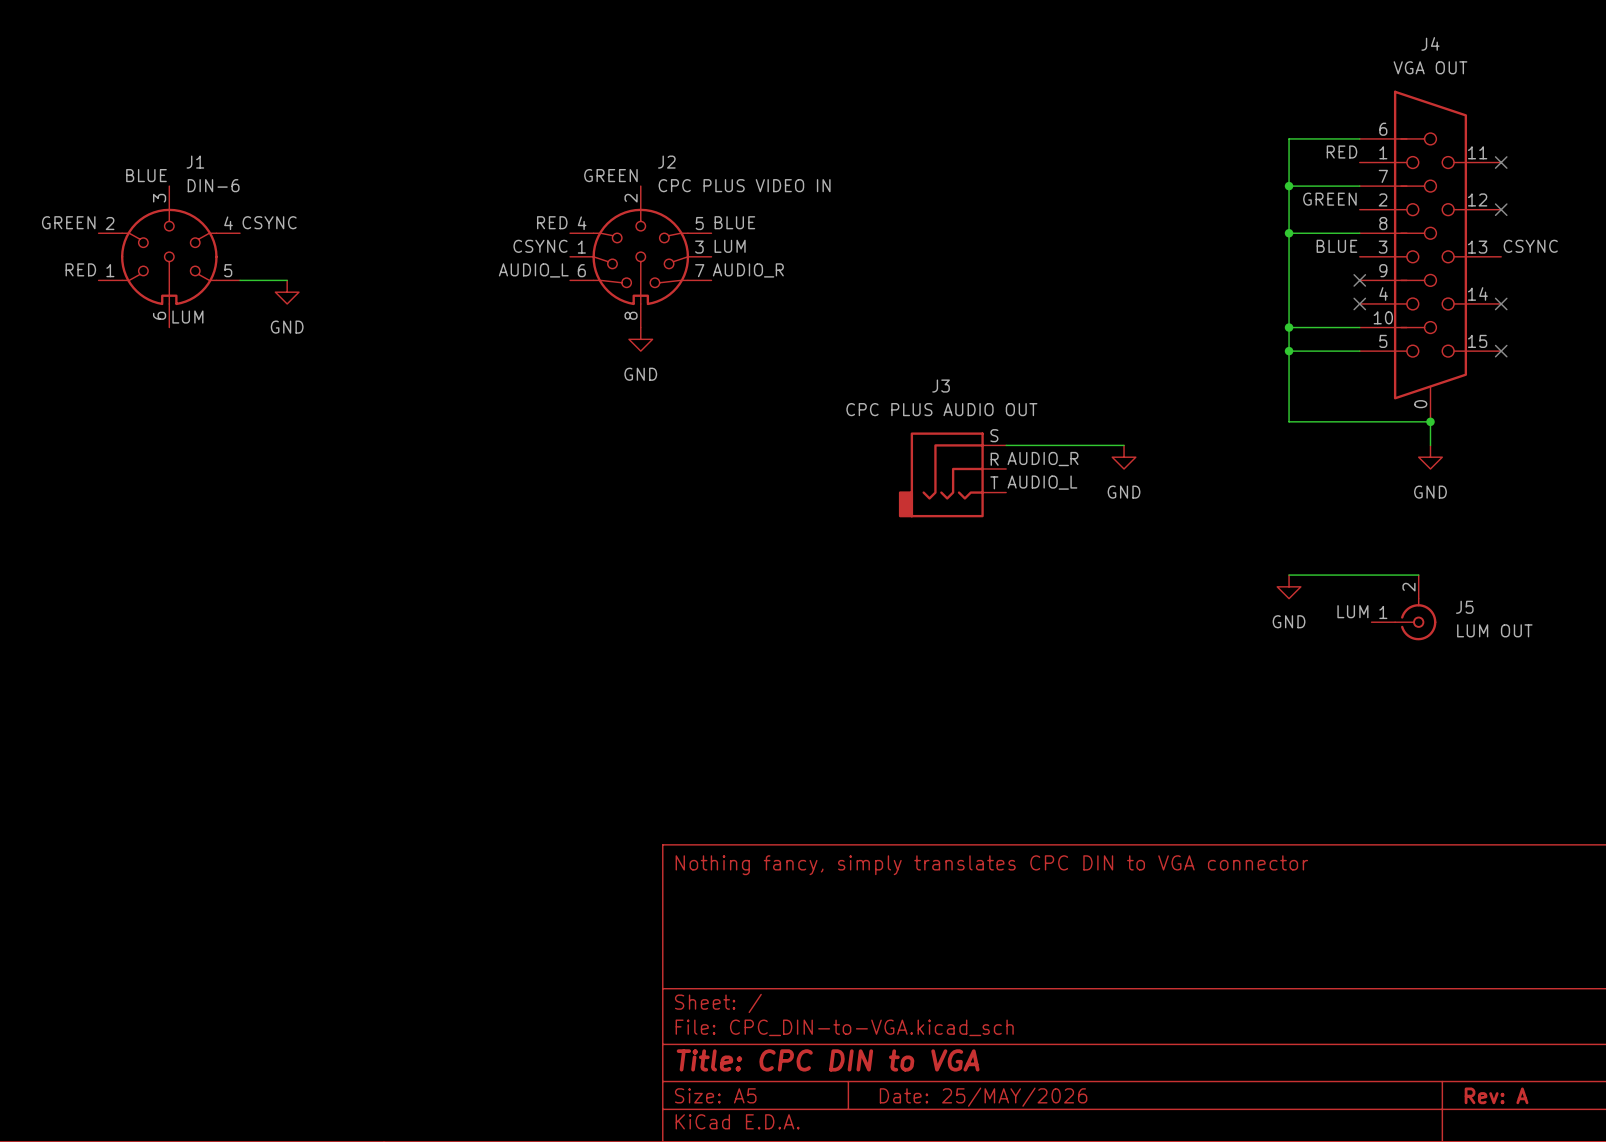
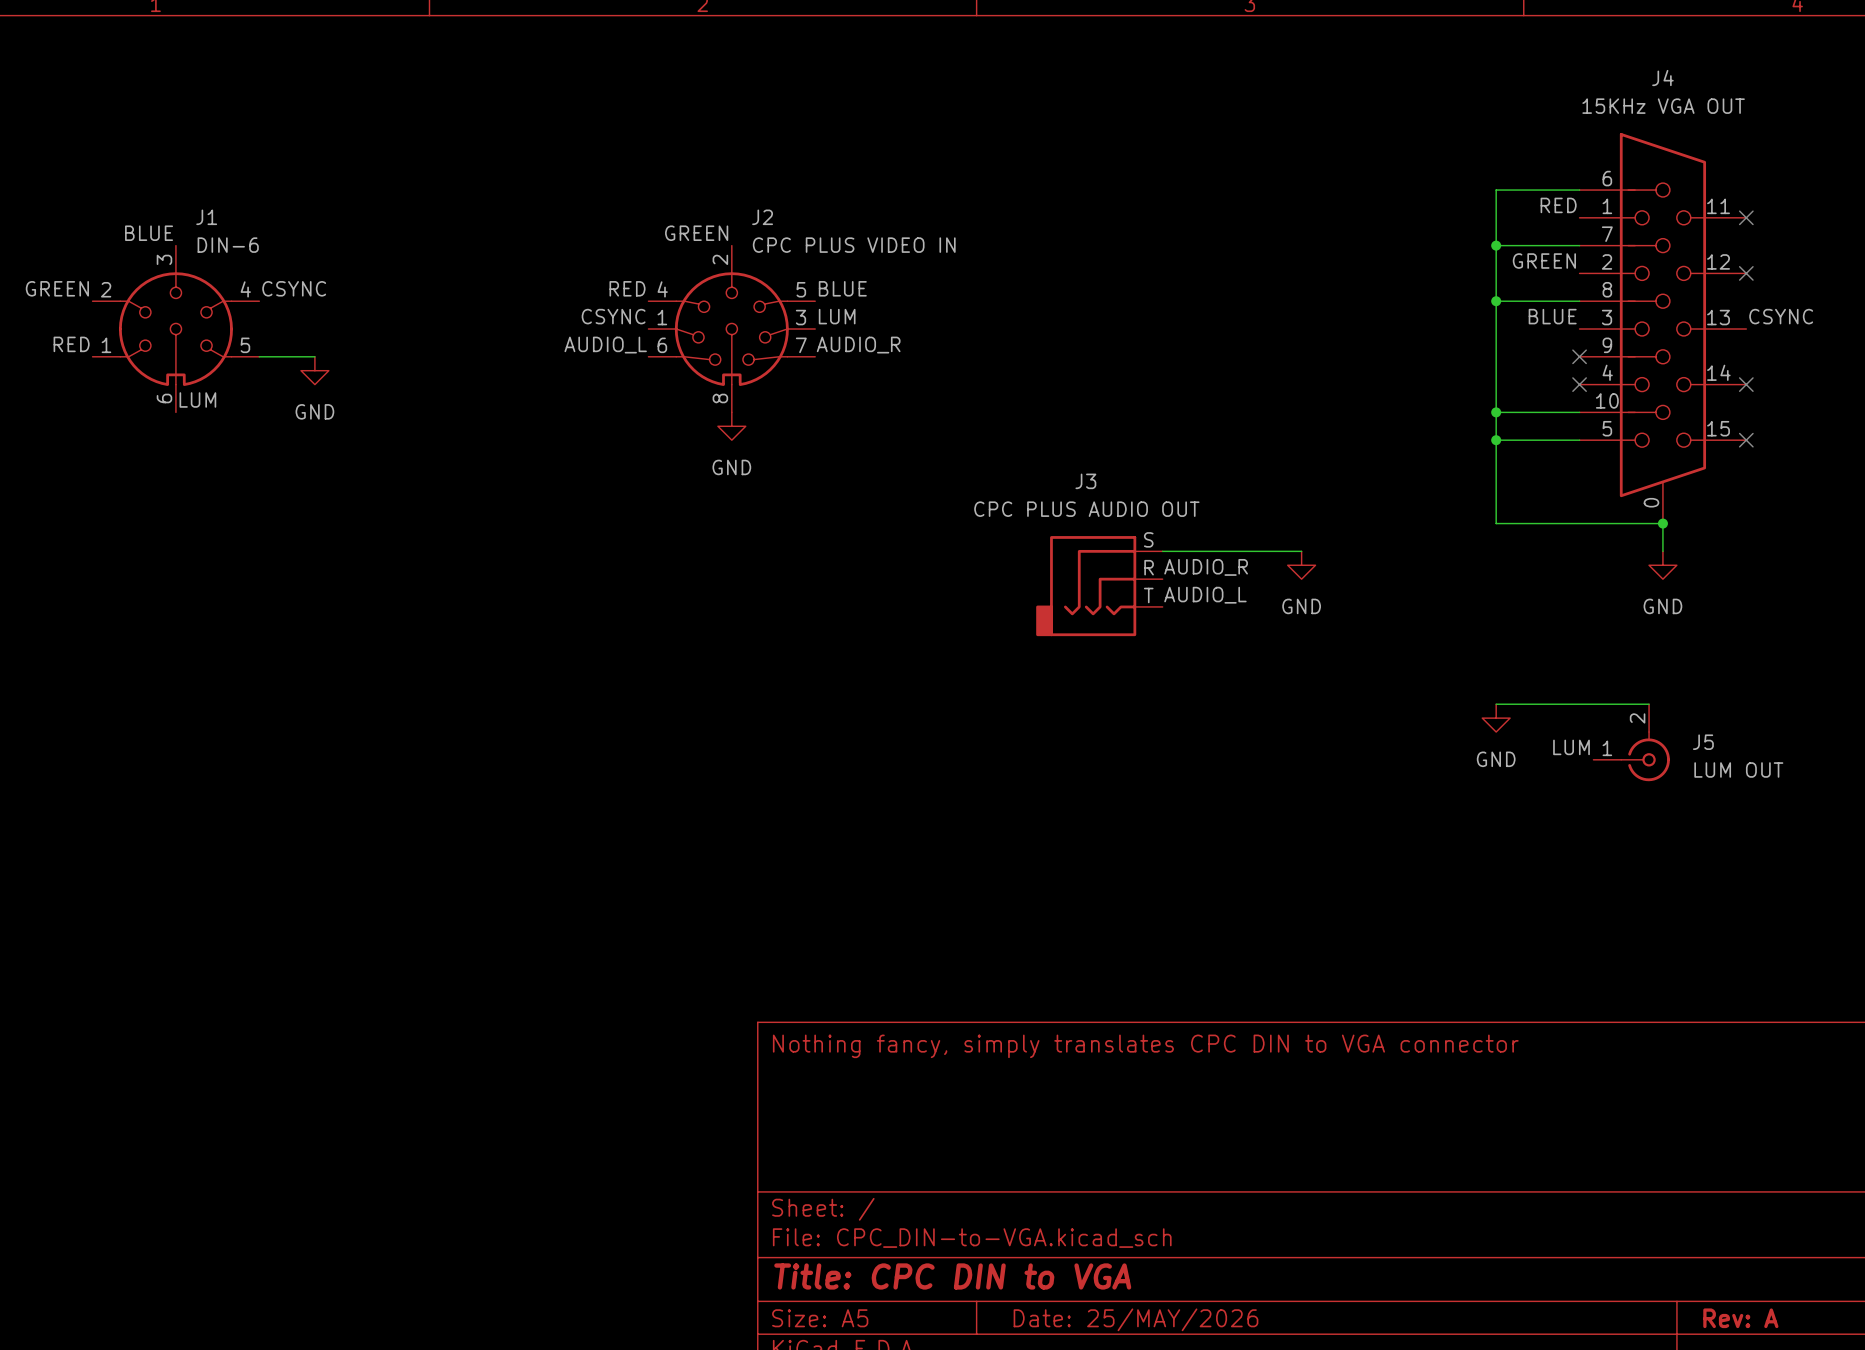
J4 value: VGA OUT (1430, 67) -> 15KHz VGA OUT (1663, 106)

